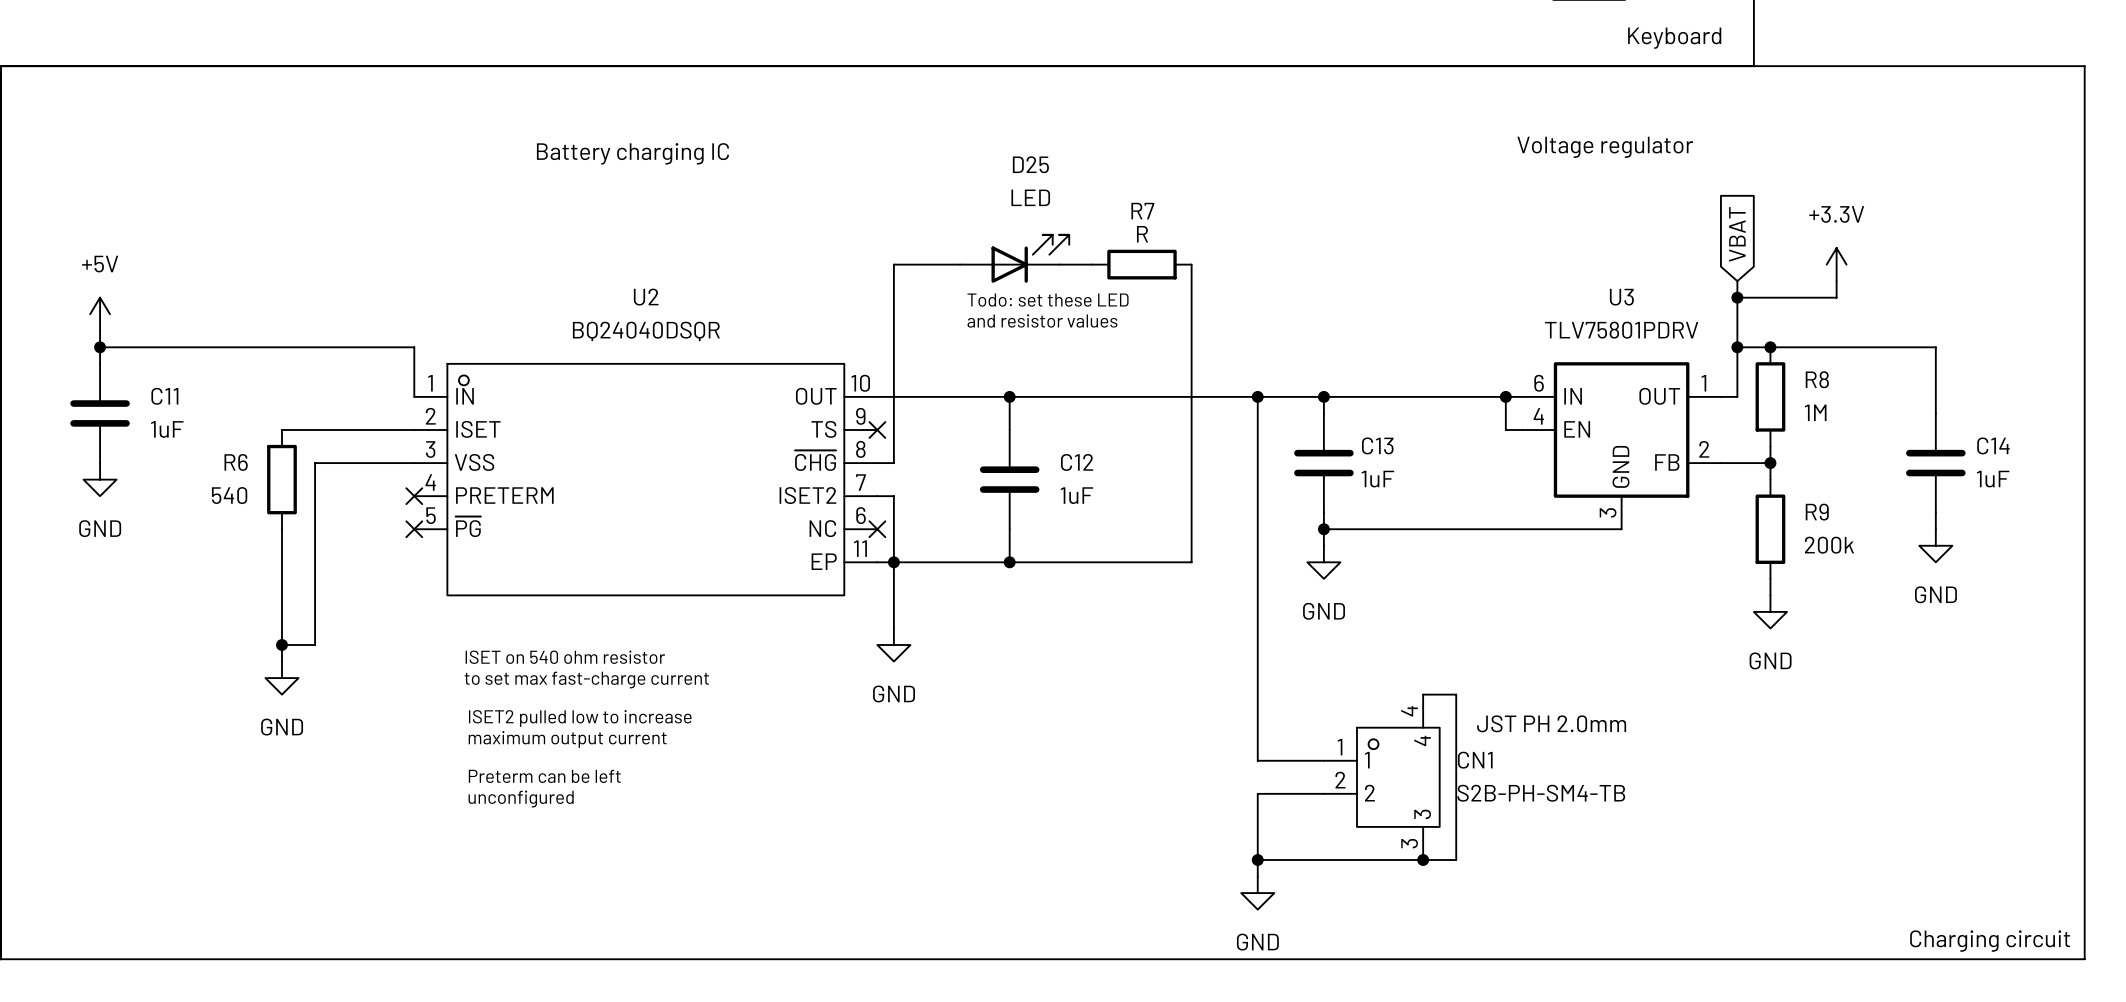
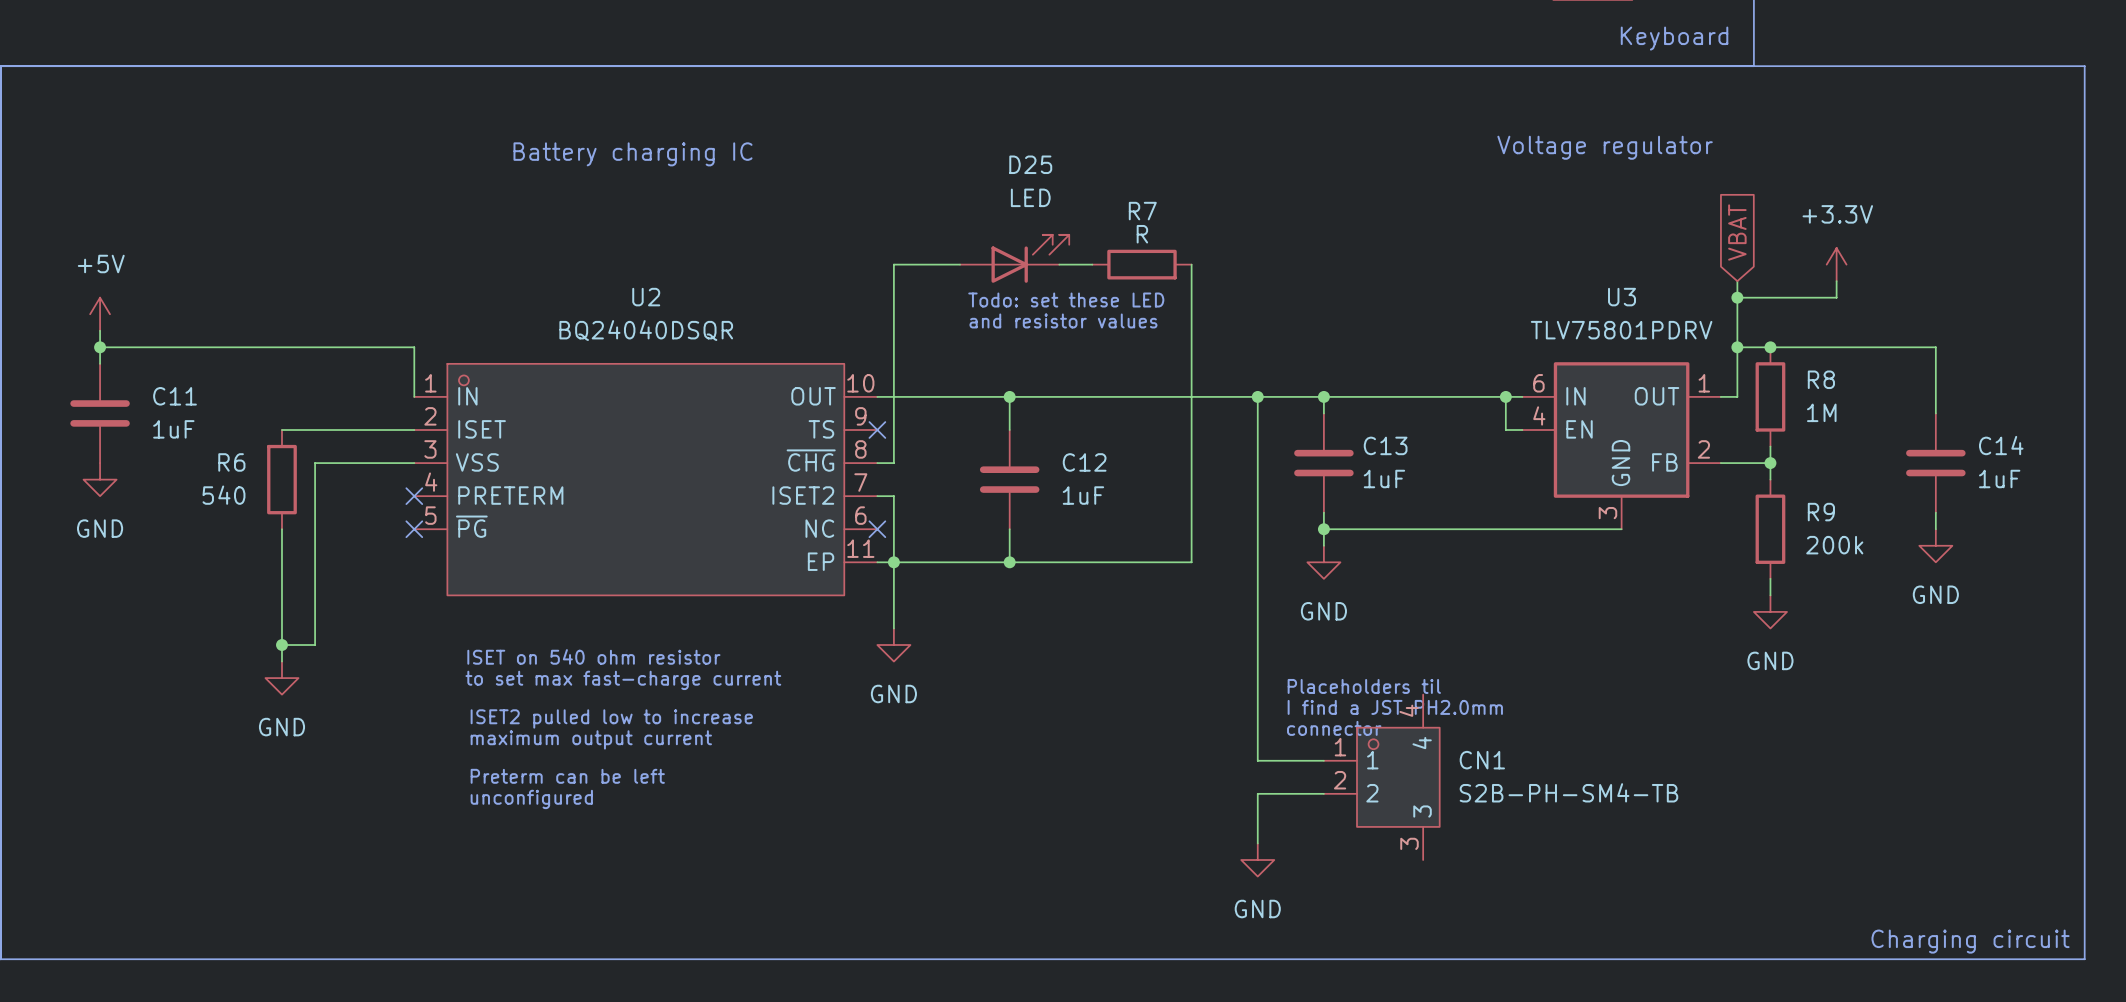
text: none -> Placeholders til (1364, 686)
wire: (1423, 694) (1456, 694) (1456, 860) (1257, 860) -> none
text: JST PH 2.0mm (1551, 723) -> I find a JST PH2.0mm (1395, 707)
text: none -> connector (1334, 728)
junction: (1257, 860) -> none
junction: (1423, 860) -> none
power symbol position: GND (1257, 893) -> GND (1257, 860)

